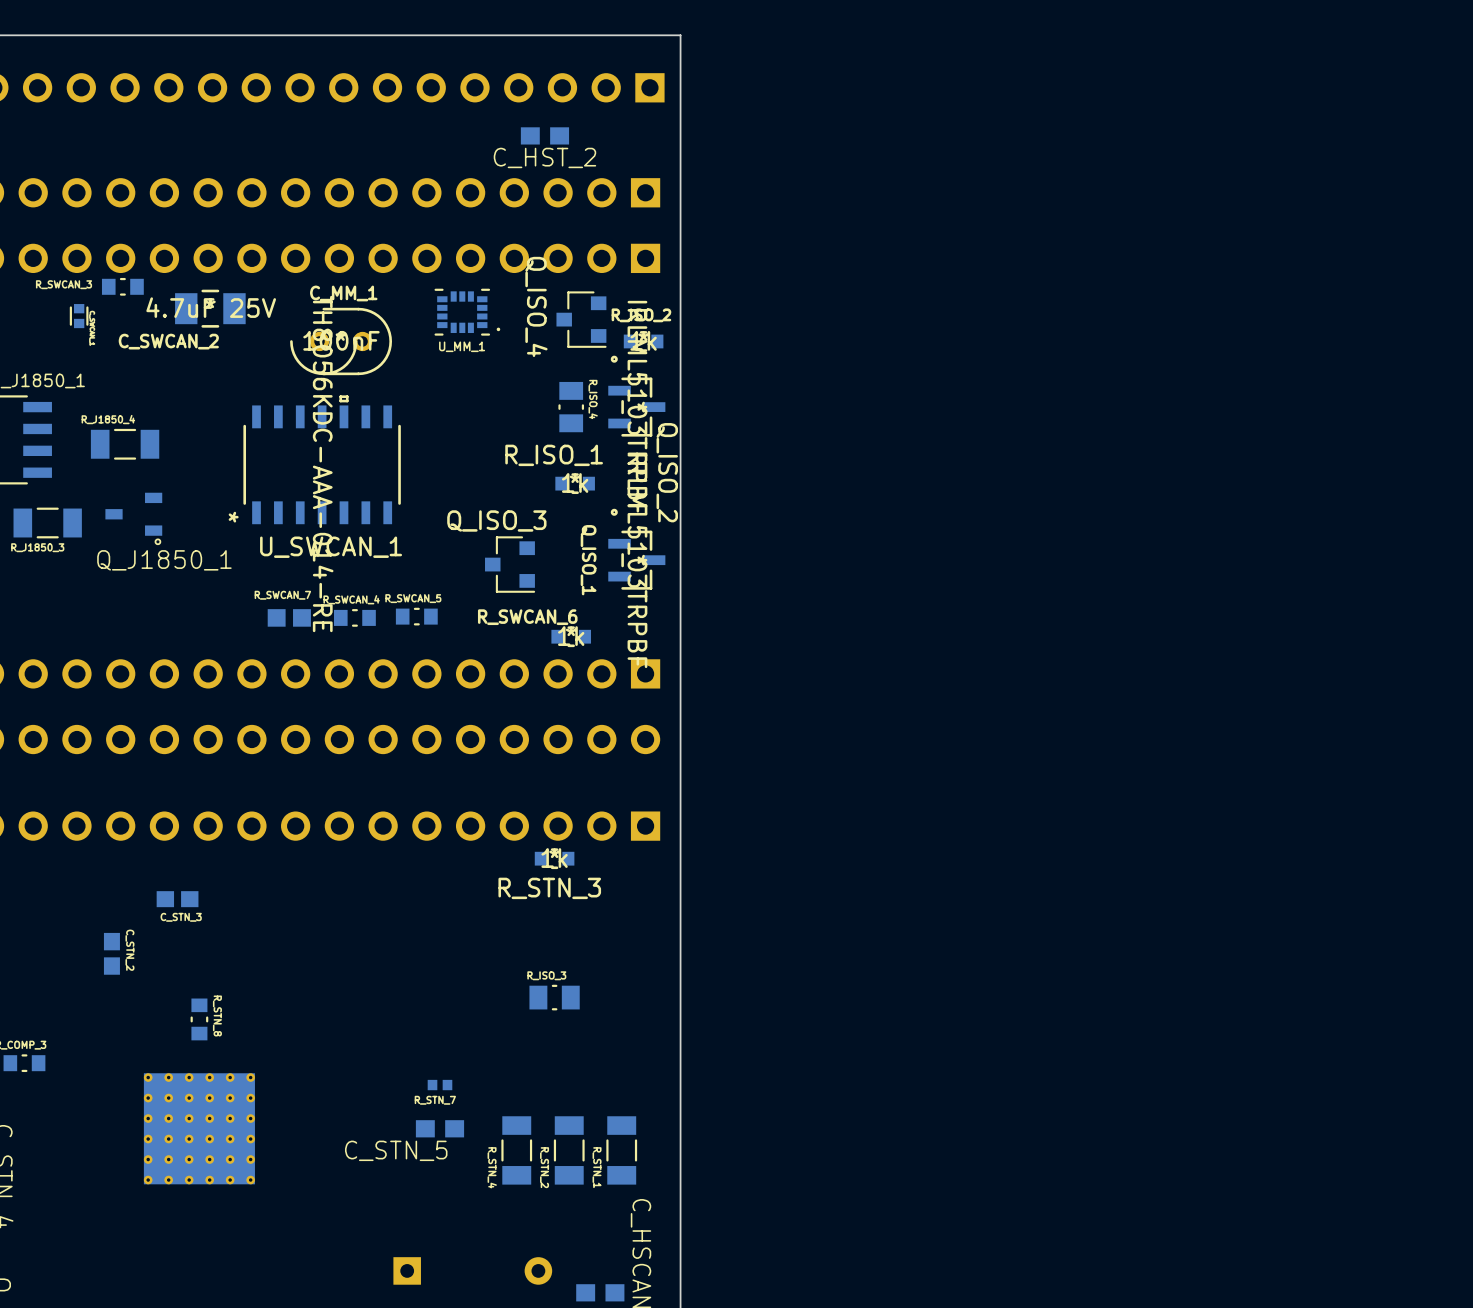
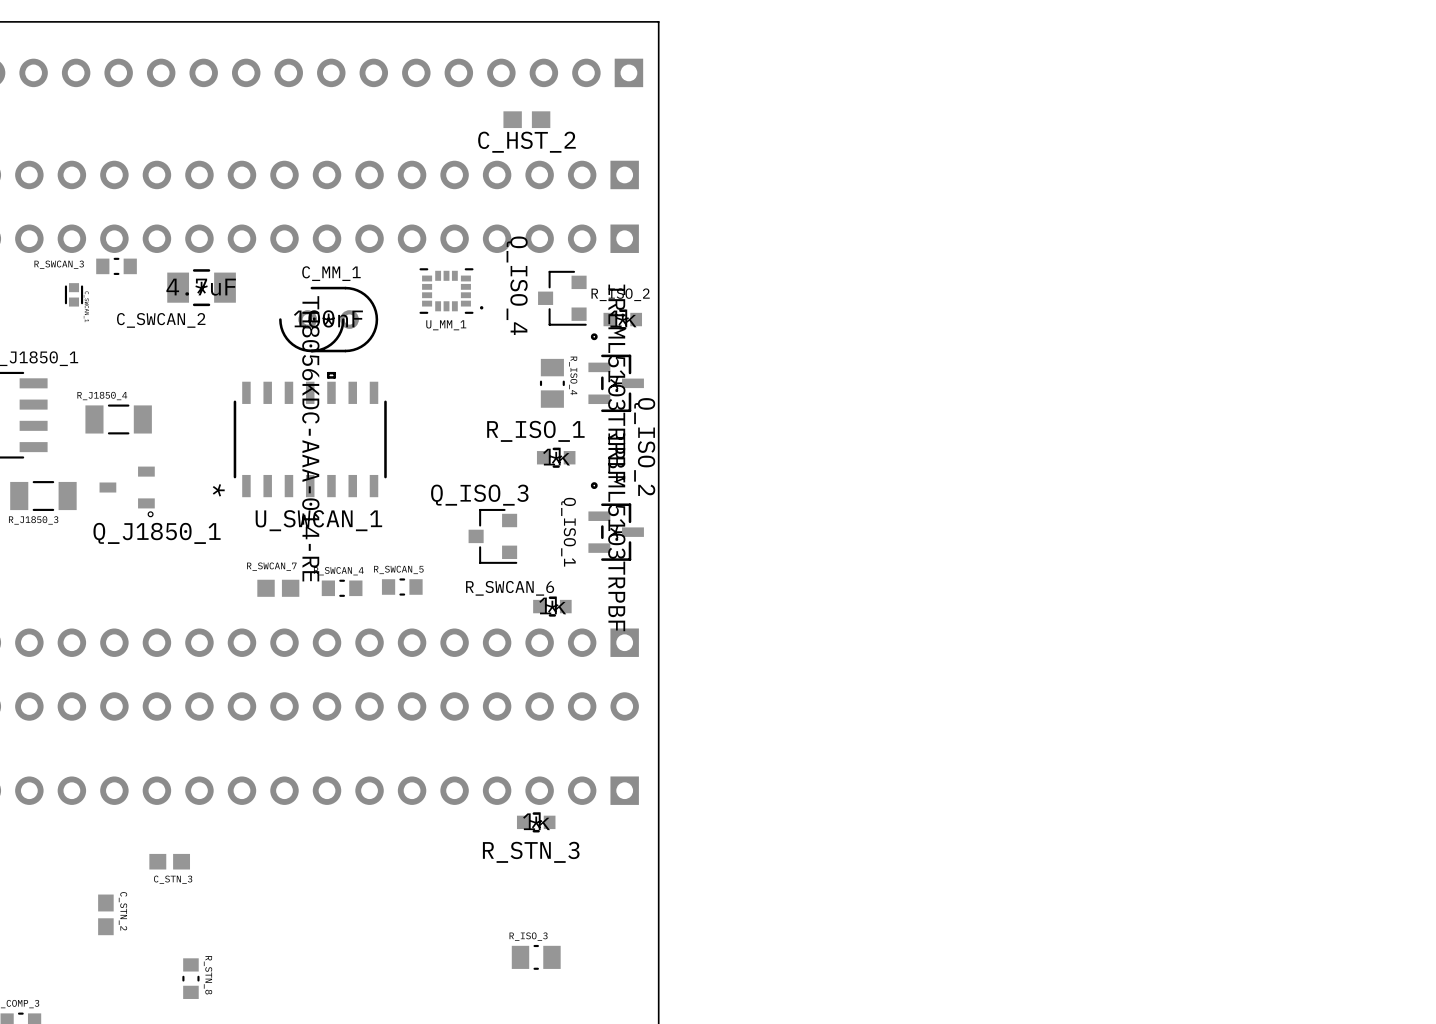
C_SWCAN_2 value: 4.7uF 25V (211, 307) -> 4.7uF (201, 287)

